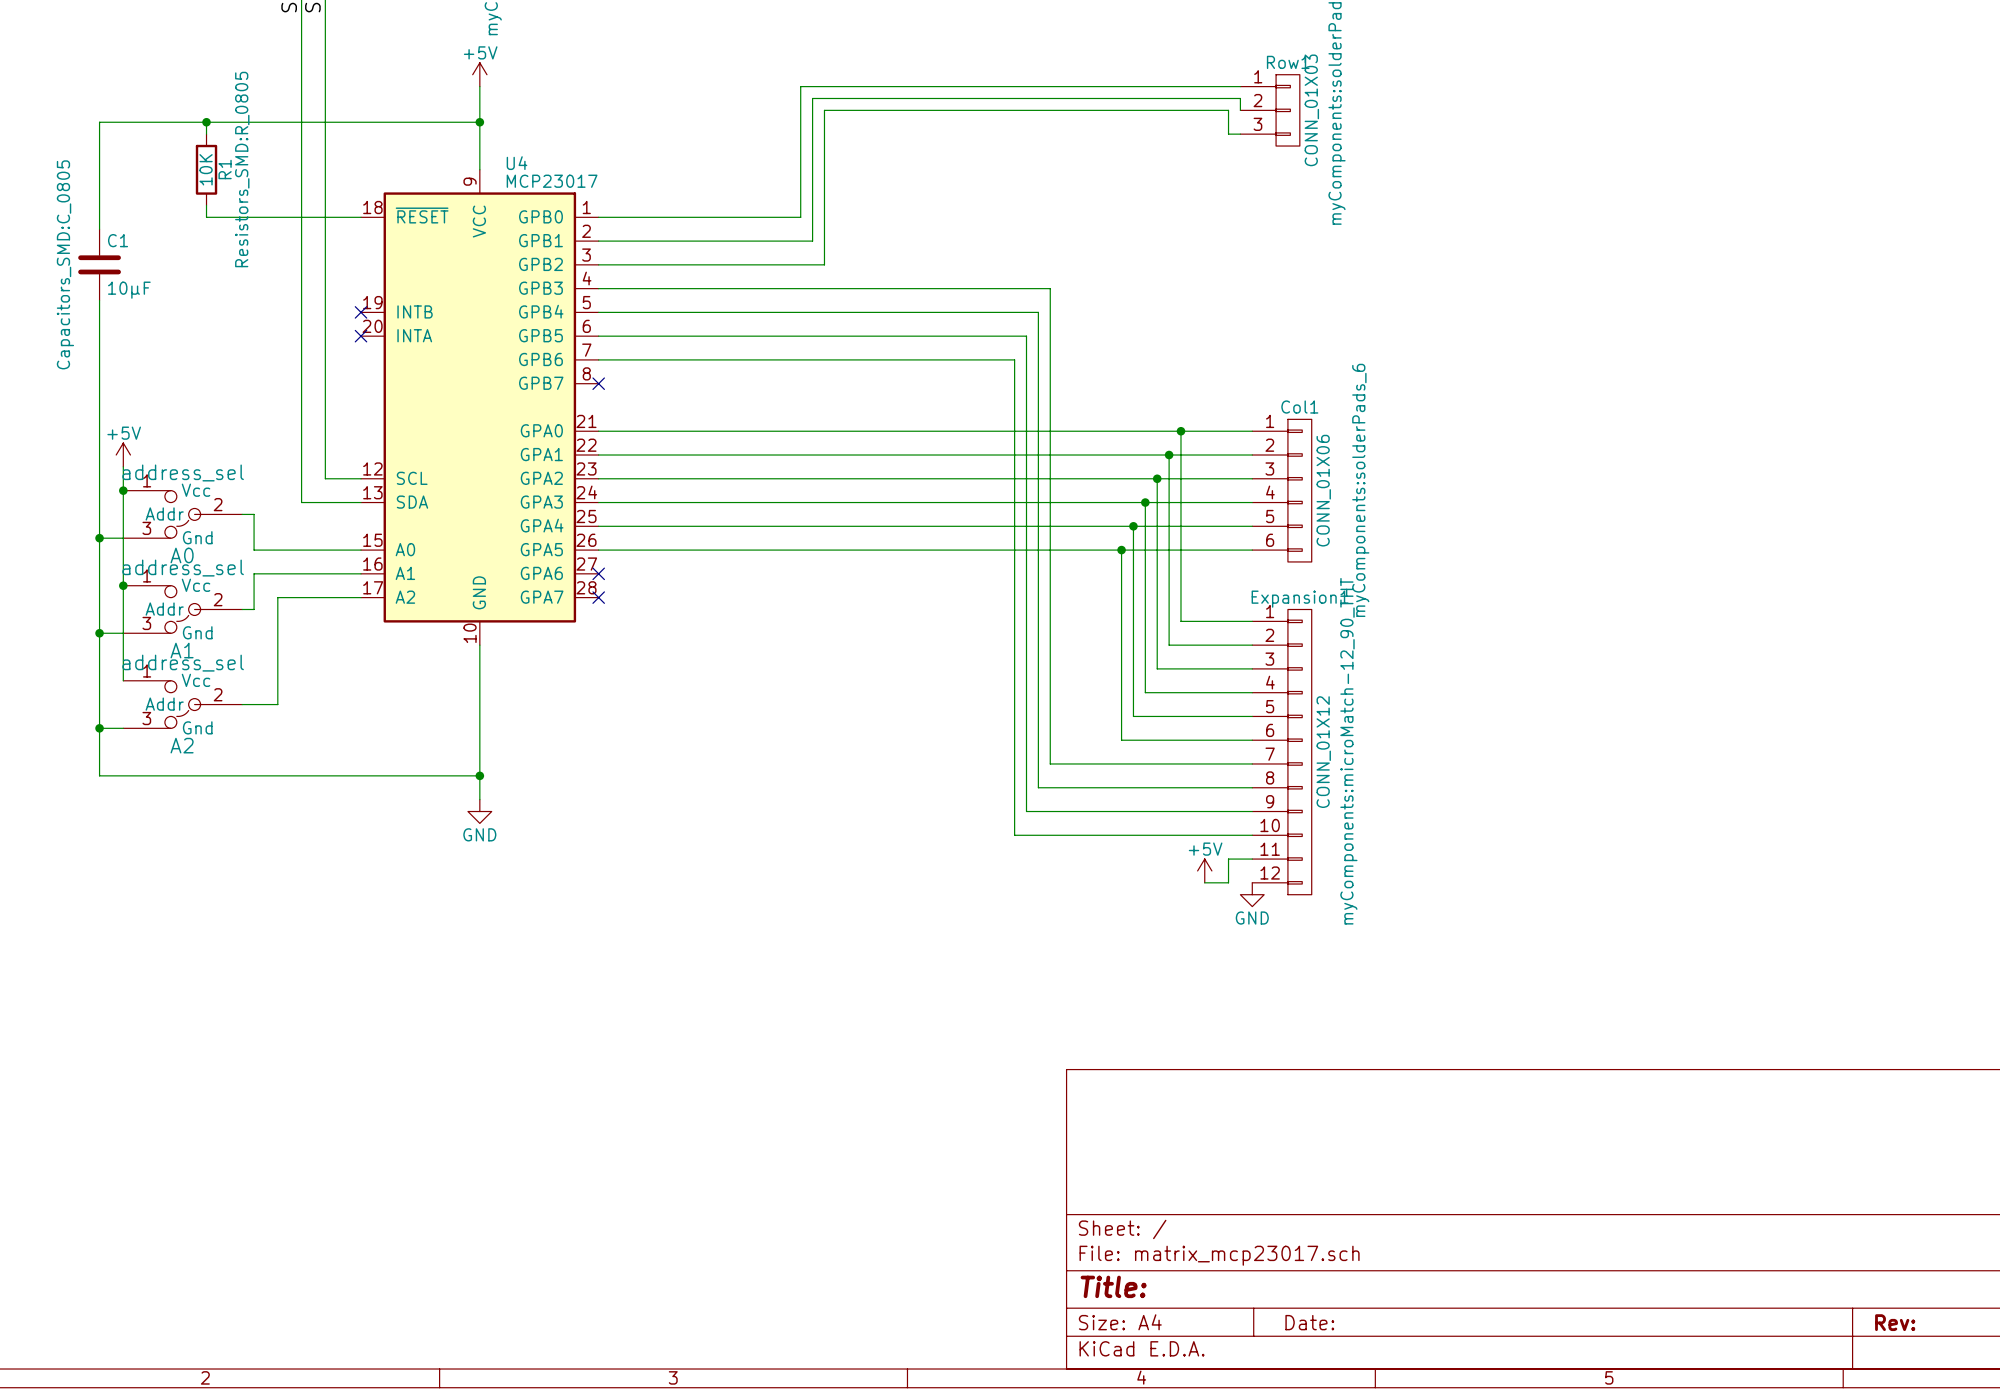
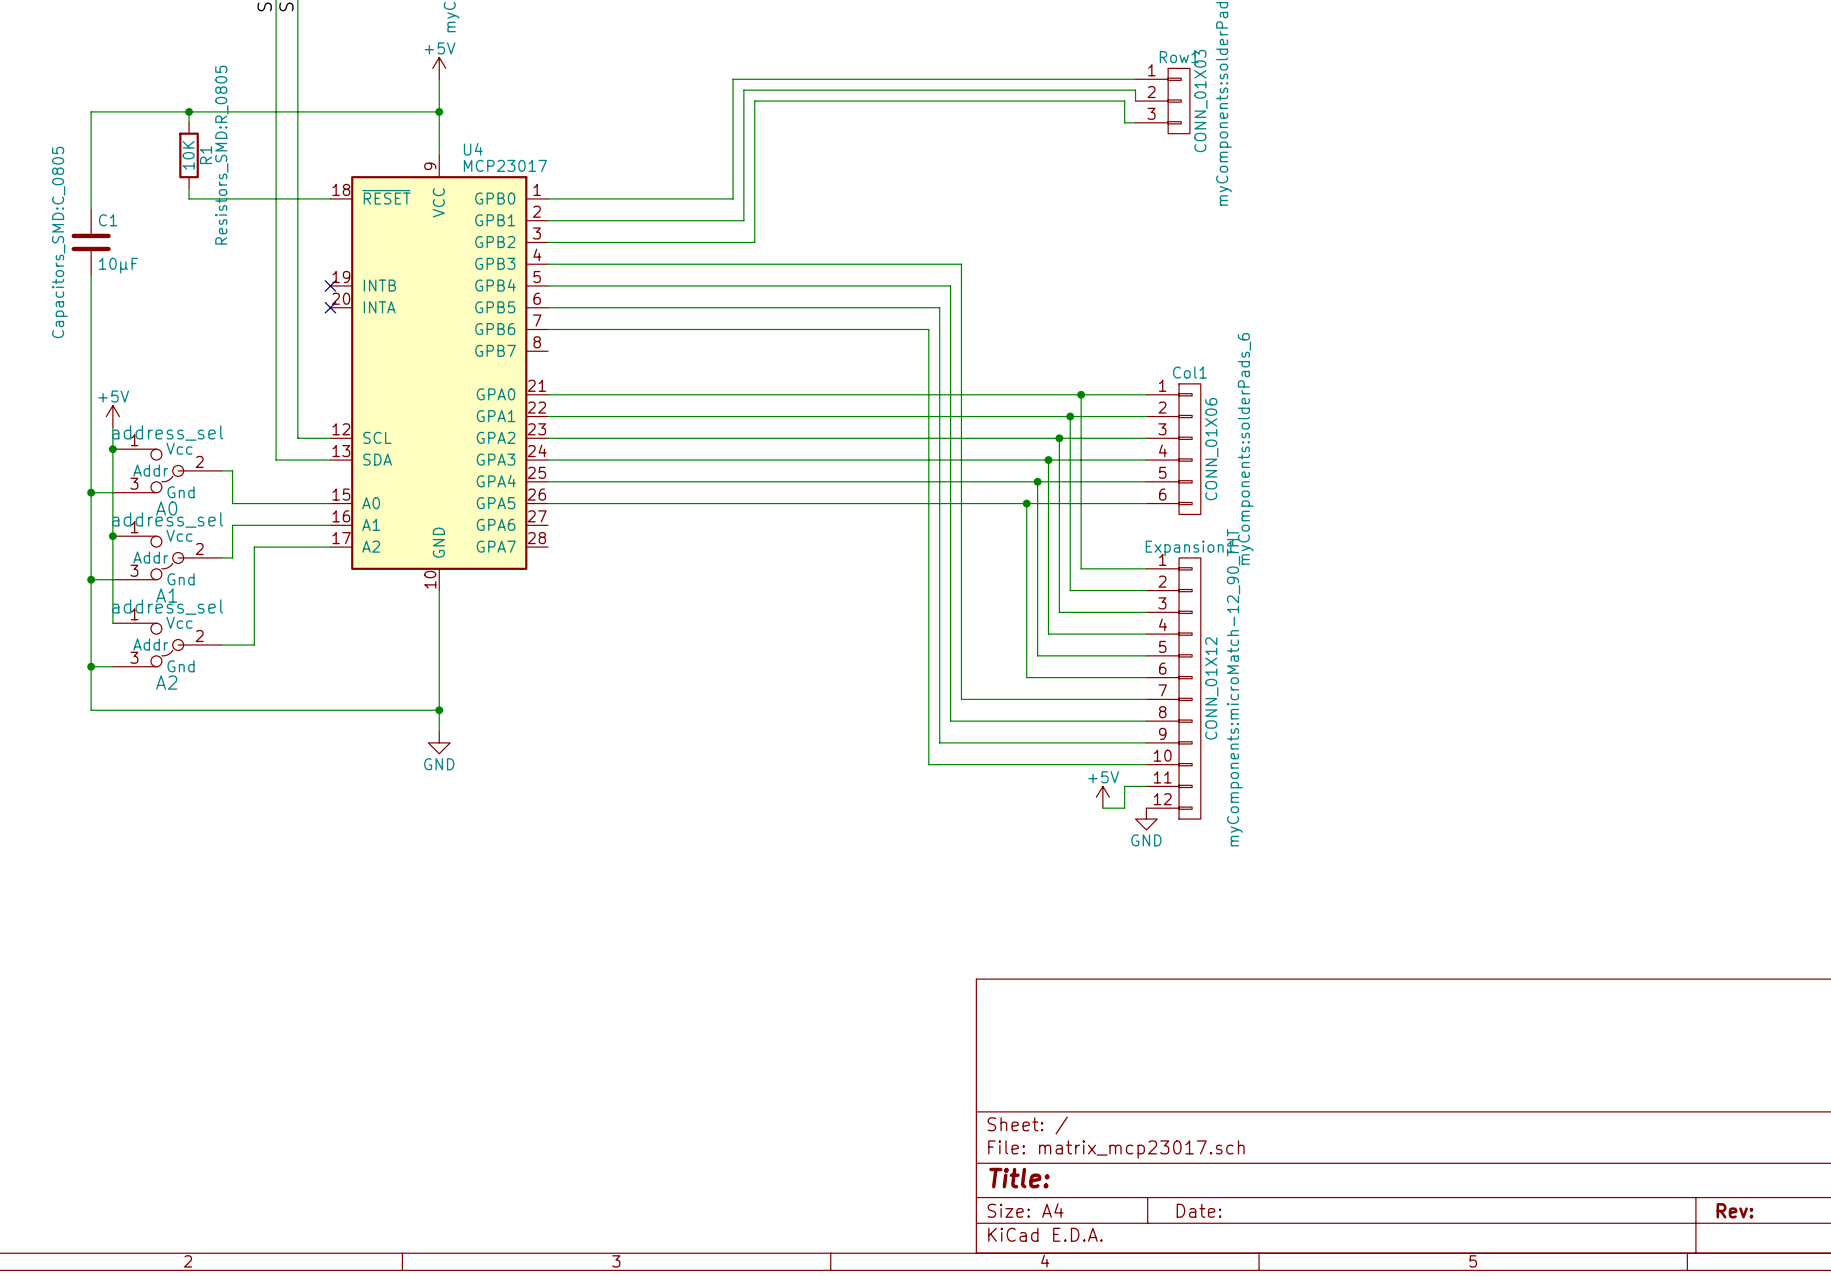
no-connect mark: (598, 383) -> none
no-connect mark: (598, 573) -> none
no-connect mark: (598, 597) -> none

